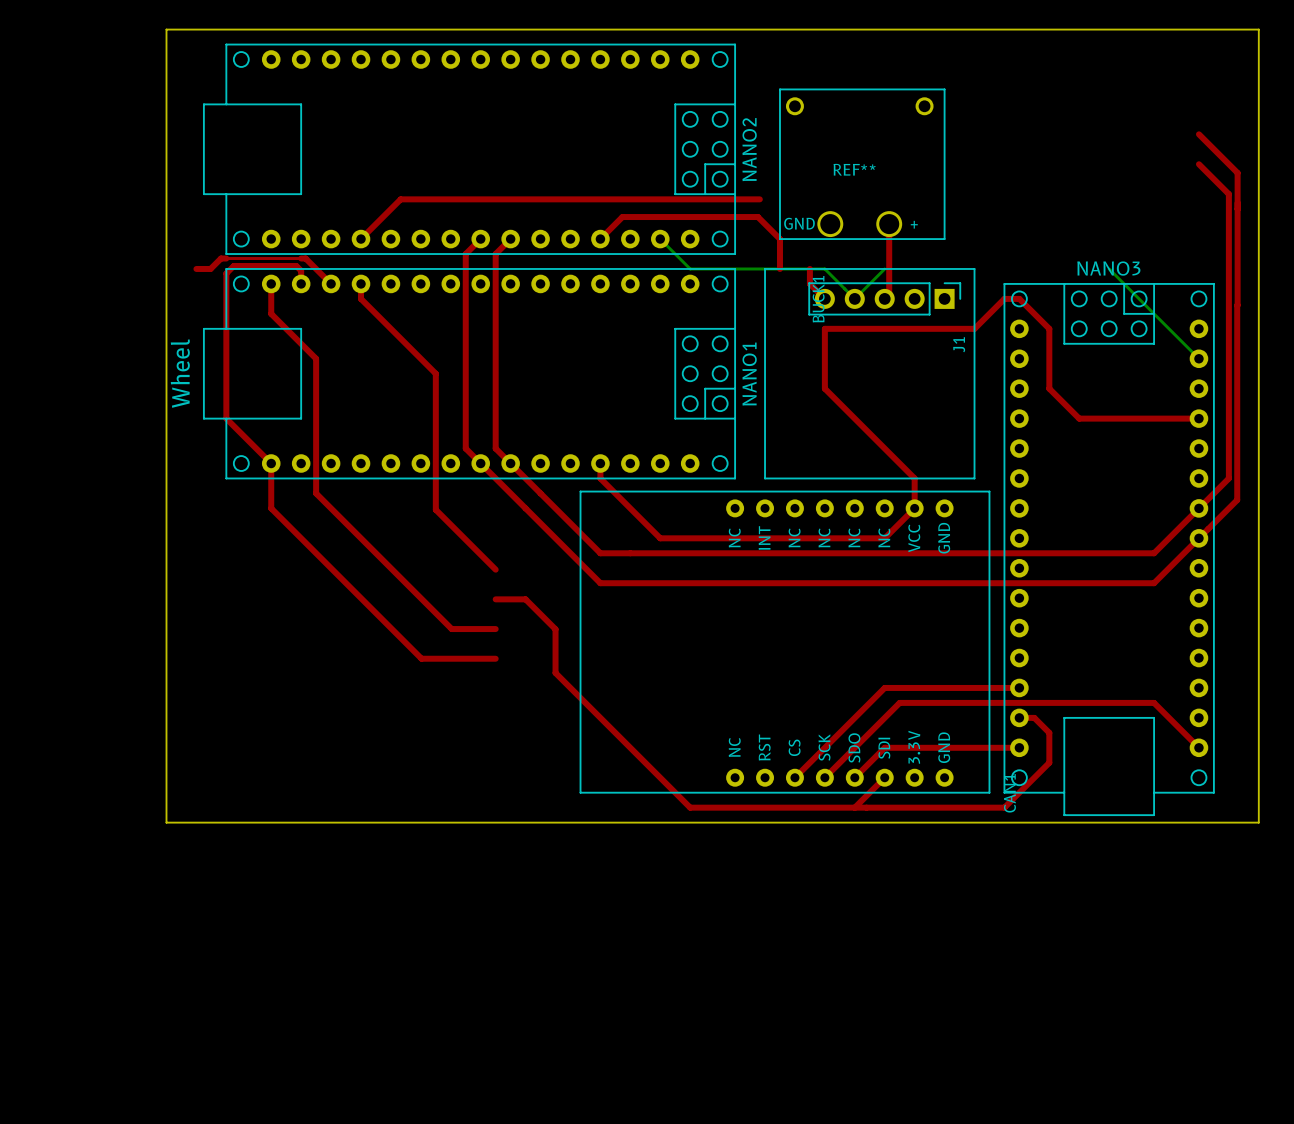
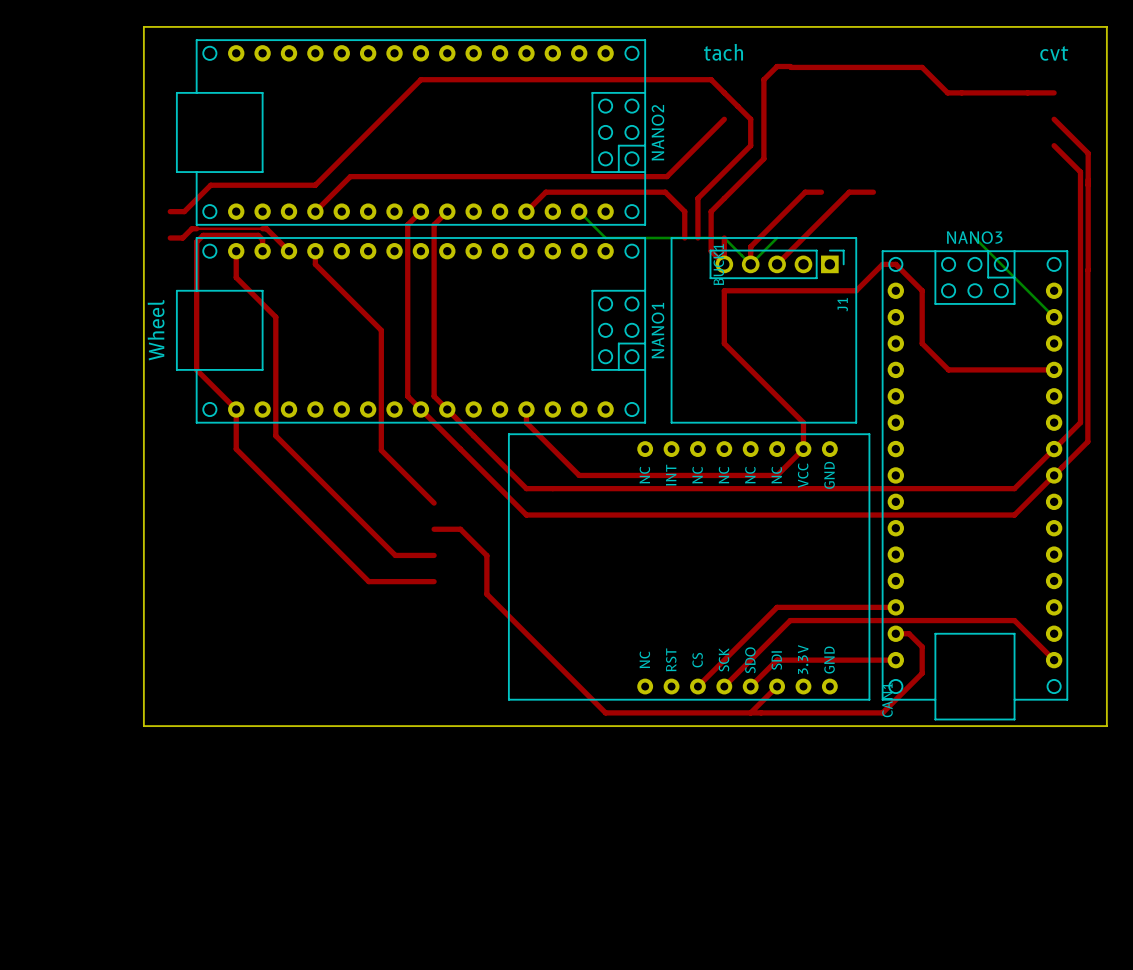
text: none -> tach (723, 52)
text: none -> cvt (1054, 53)
top track: none -> (1054, 92) (947, 92) (922, 67) (777, 66) (763, 79) (763, 158) (711, 211) (711, 238)
top track: none -> (724, 119) (666, 176)
REF**: (862, 164) -> none
top track: none -> (821, 192) (805, 192) (750, 246) (750, 264)
top track: (889, 224) (889, 294) -> (873, 192) (849, 192) (781, 260)
top track: none -> (170, 211) (184, 211) (210, 185) (315, 185) (420, 79) (711, 79) (750, 119) (750, 145) (697, 198) (697, 238)
top track: none -> (724, 238) (724, 264)

